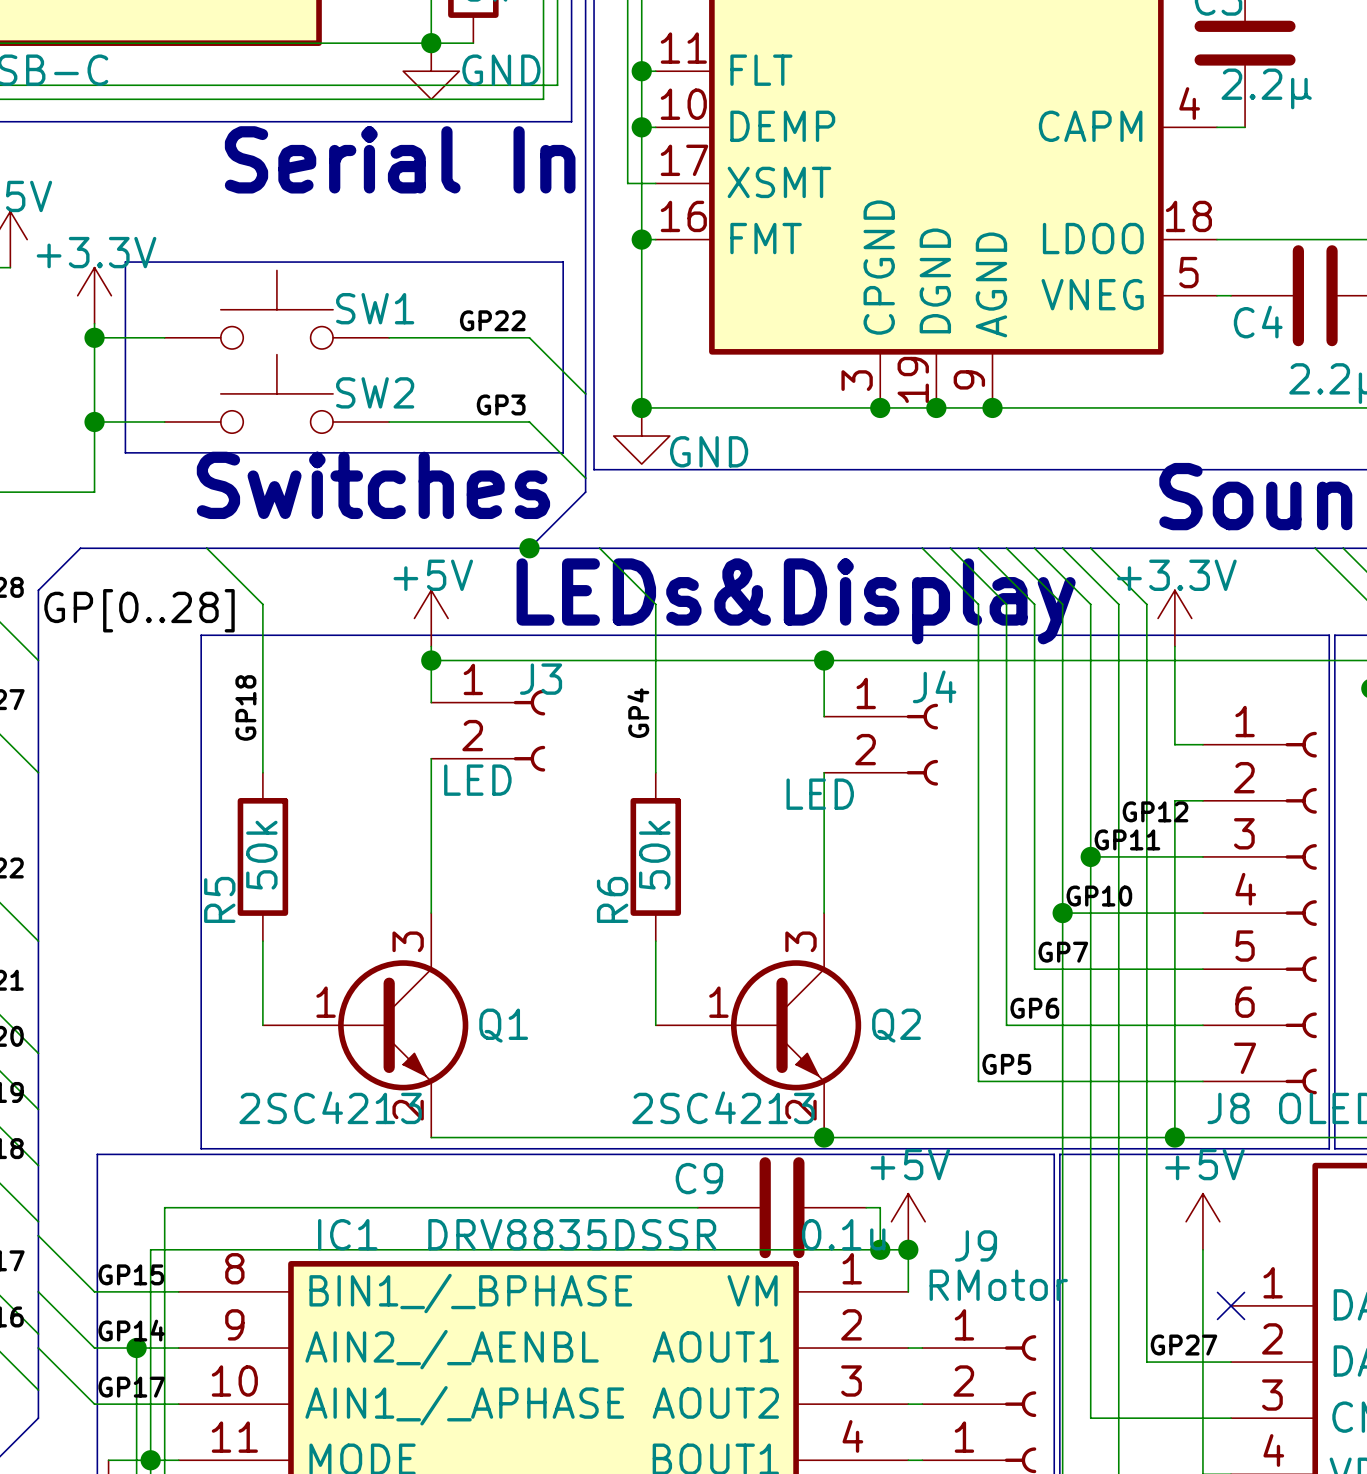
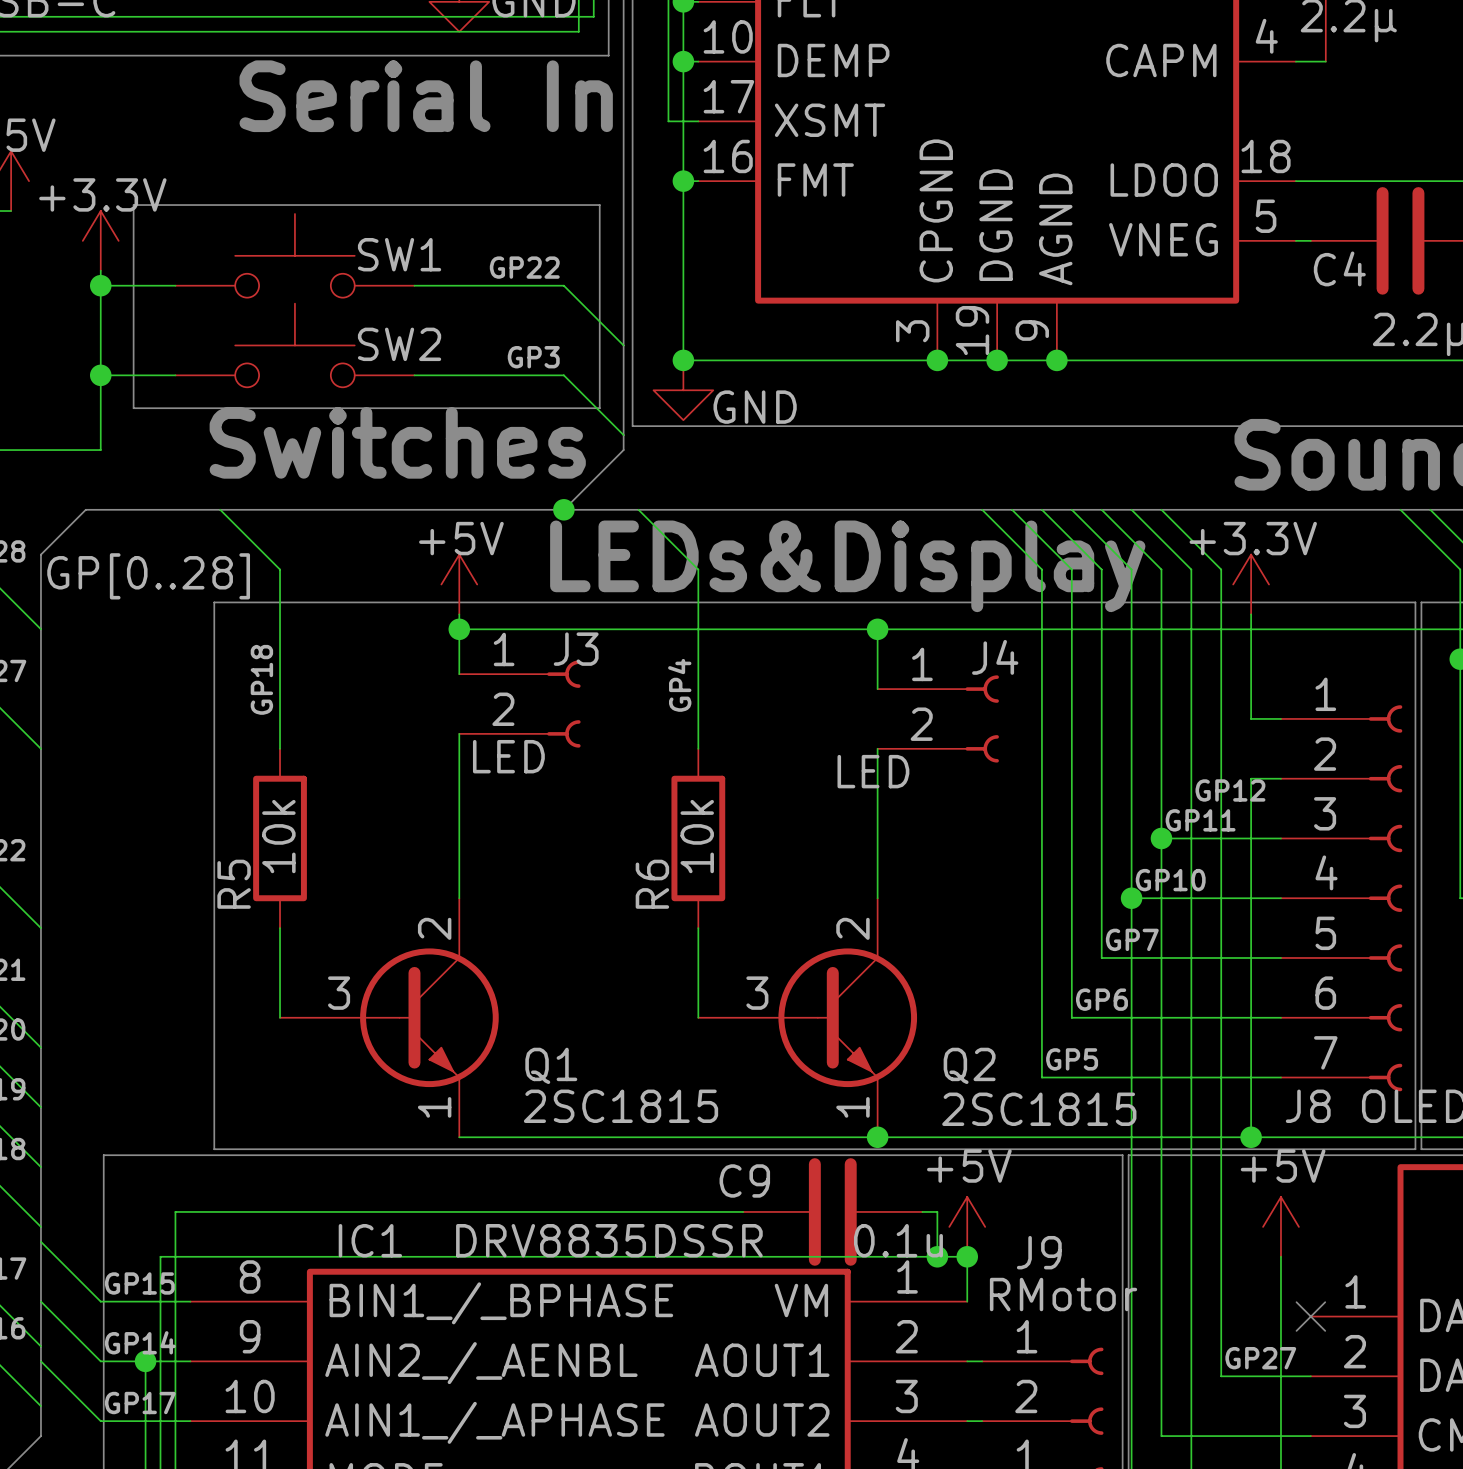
R5 value: 50k (261, 855) -> 10k (278, 836)
R6 value: 50k (654, 855) -> 10k (697, 836)
Q1 symbol: [262, 913, 469, 1138] -> [280, 898, 499, 1138]
Q2 symbol: [655, 913, 862, 1138] -> [698, 898, 918, 1138]
Q1 name position: Q1 (503, 1025) -> Q1 (551, 1065)
Q2 name position: Q2 (896, 1025) -> Q2 (969, 1065)
Q1 value: 2SC4213 (330, 1107) -> 2SC1815 (621, 1106)
Q2 value: 2SC4213 (723, 1107) -> 2SC1815 (1039, 1109)

